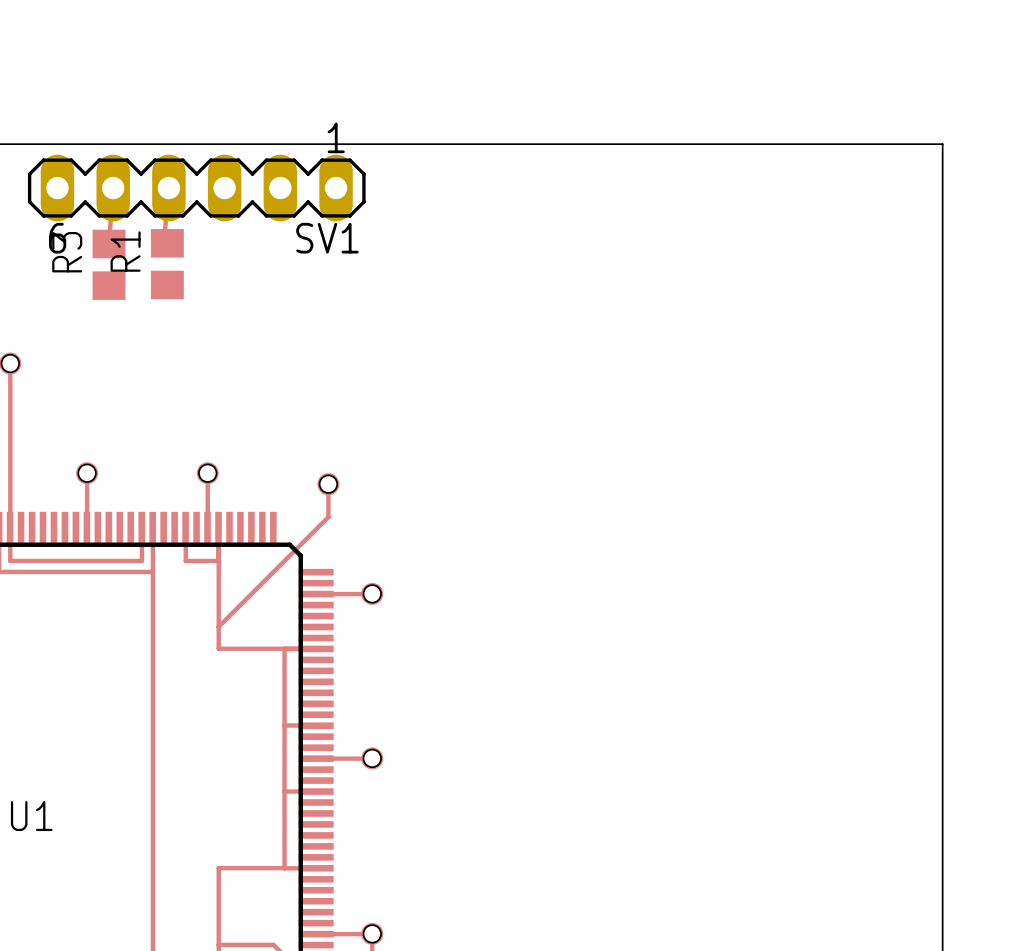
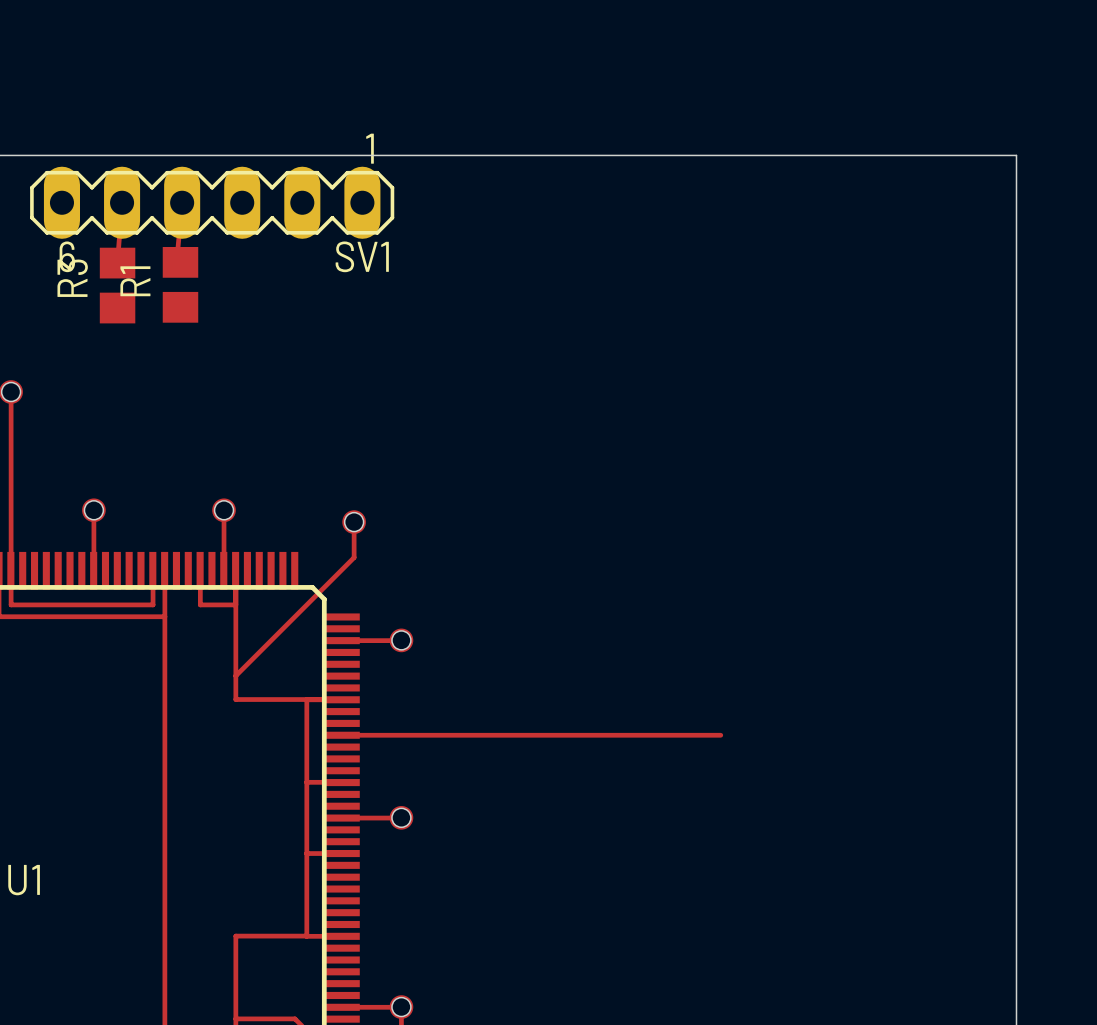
track: none -> (340, 735) (720, 735)

